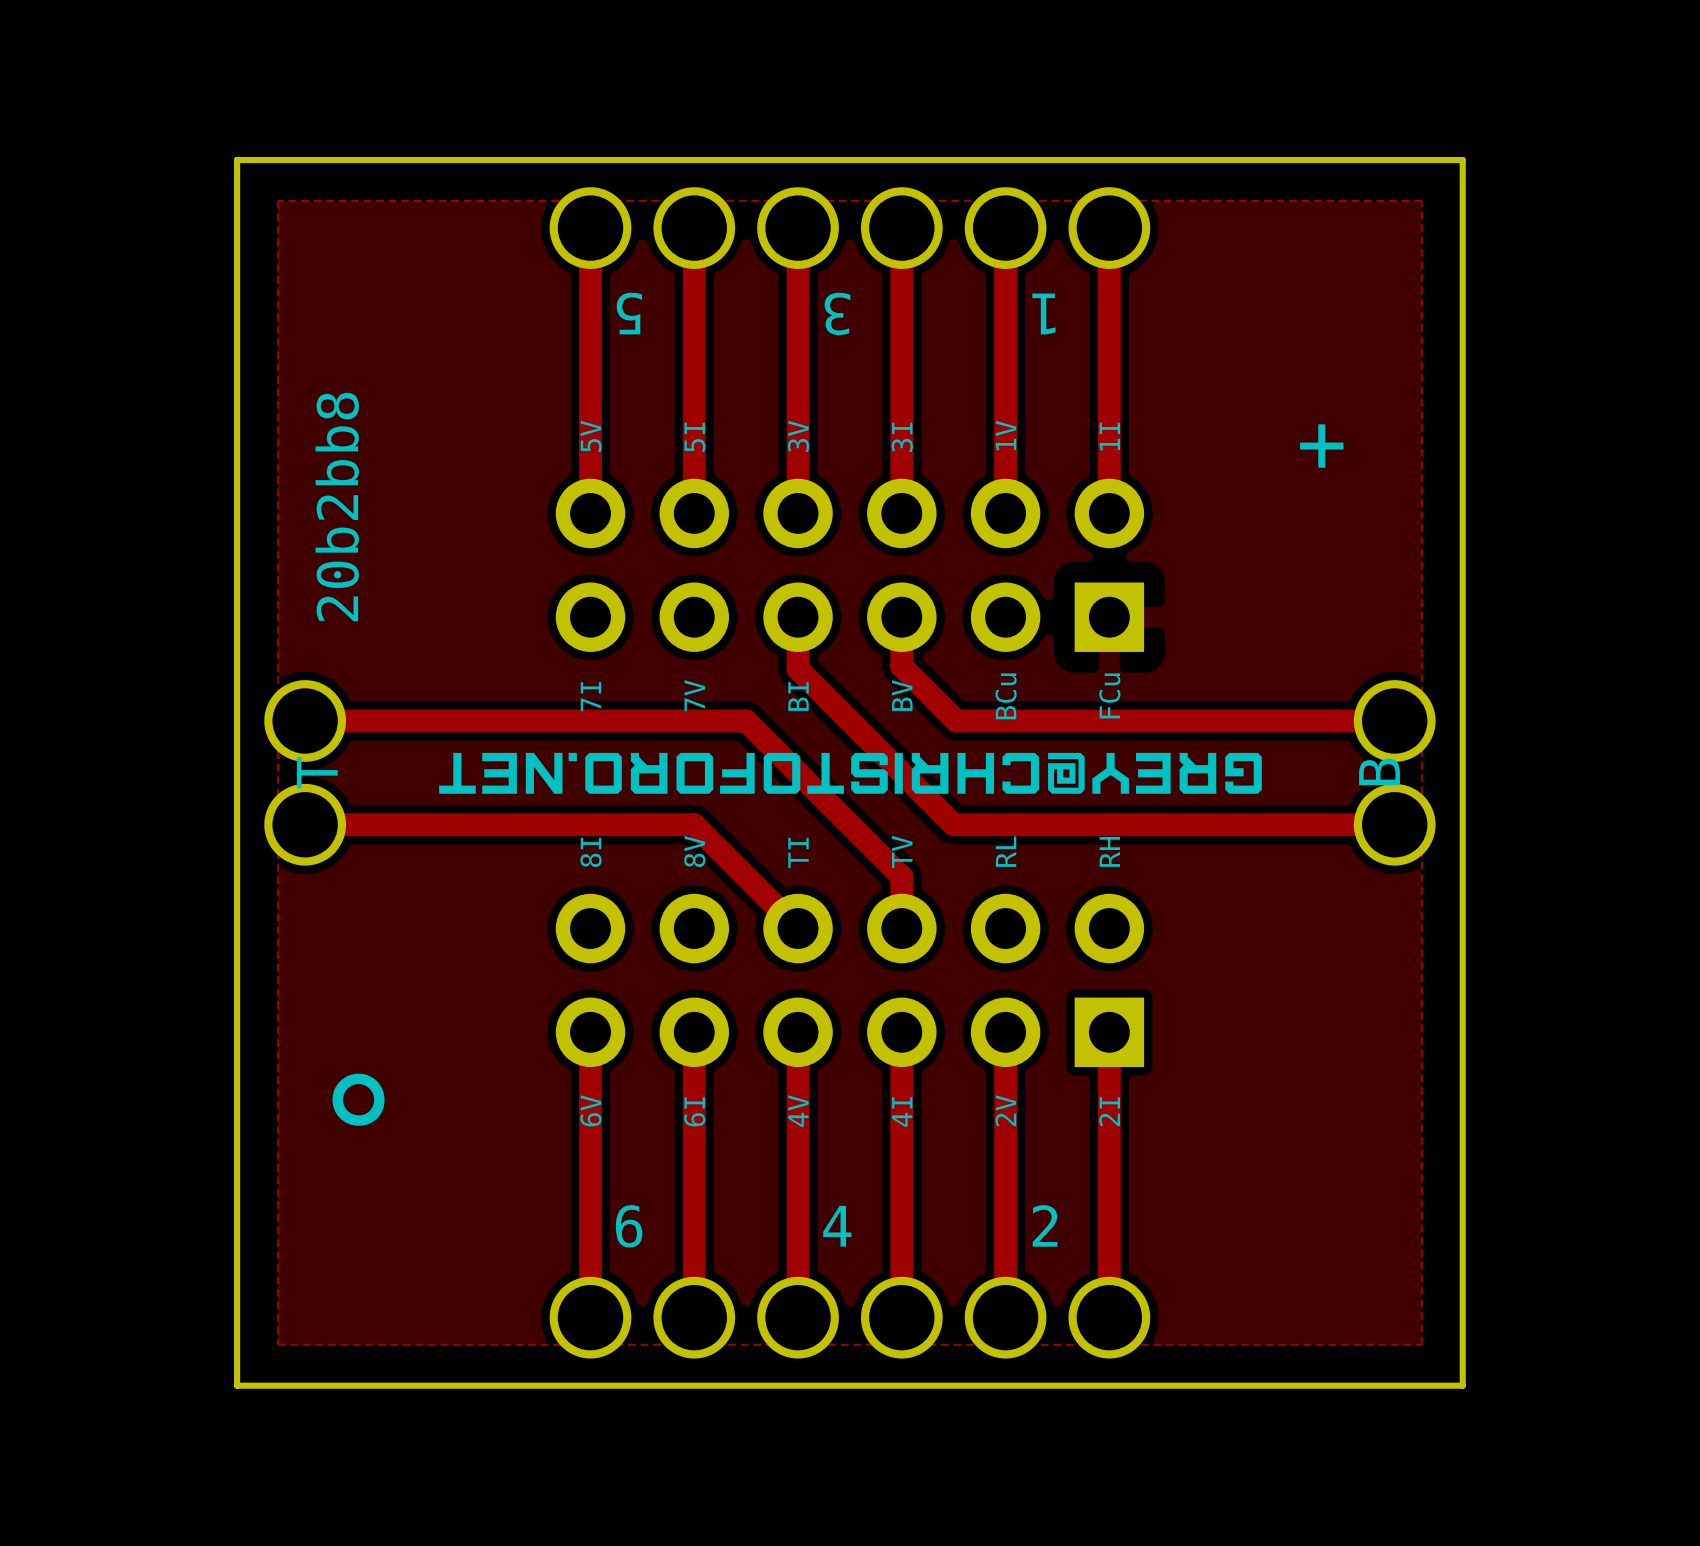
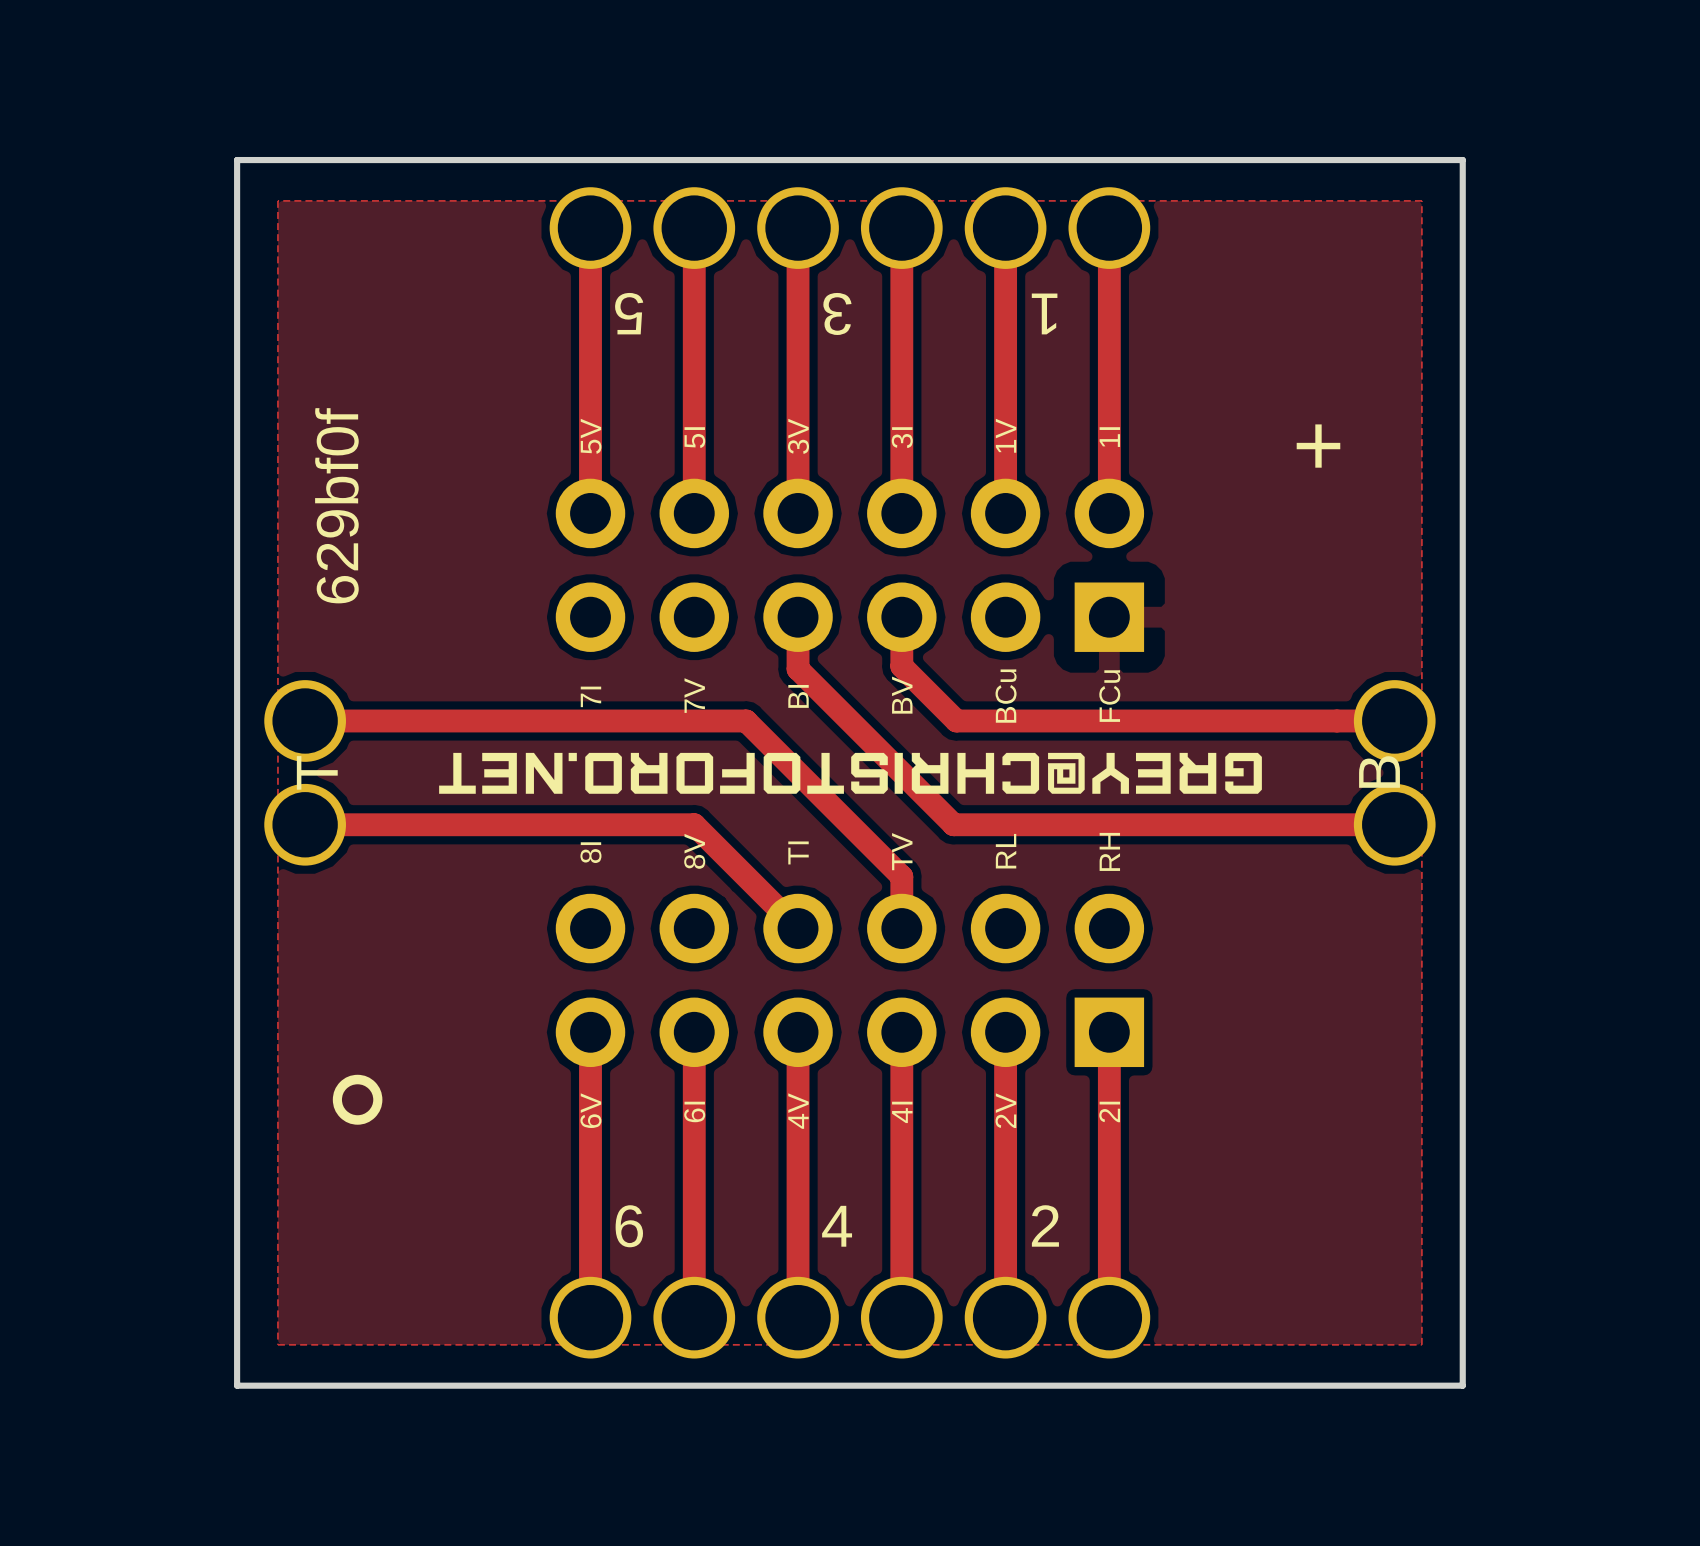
text: 20b2bb8 (337, 507) -> 629bf0f (336, 505)

